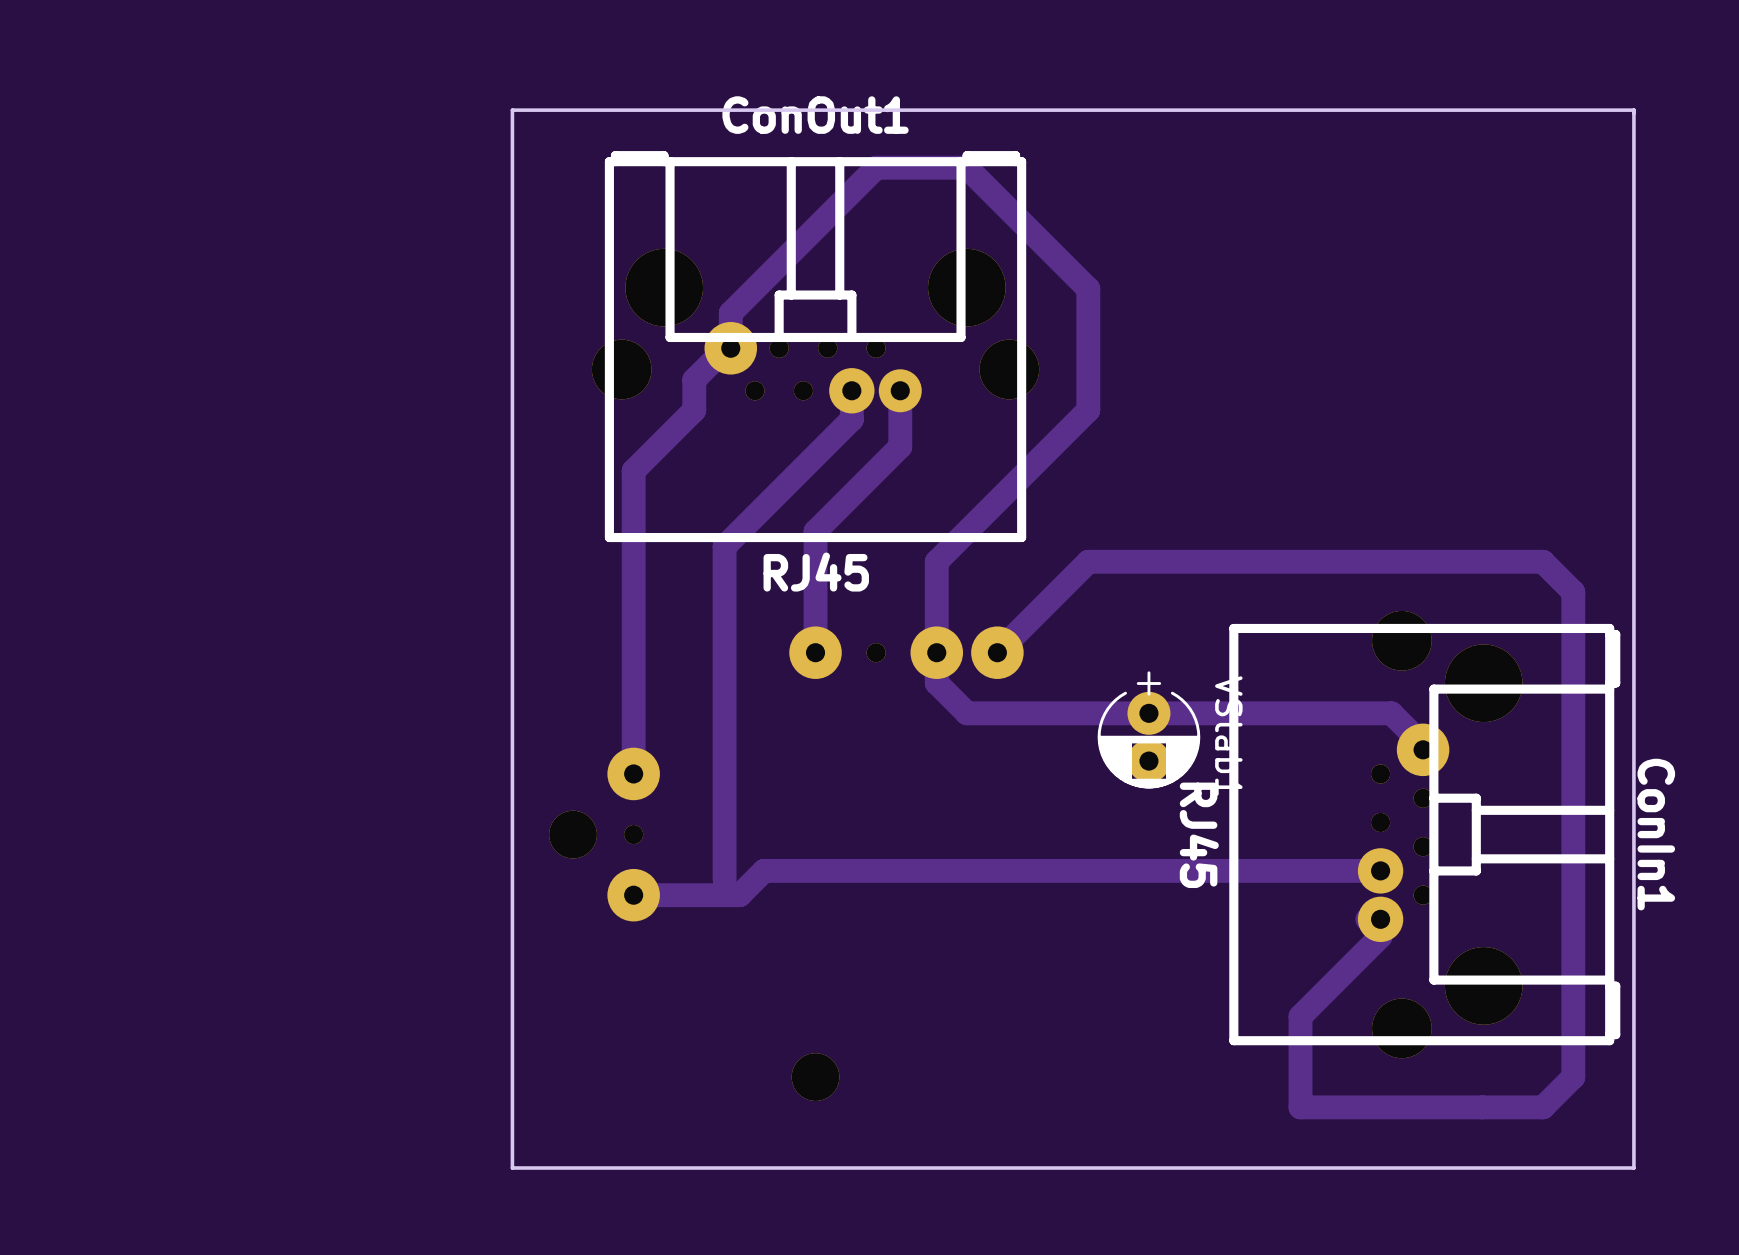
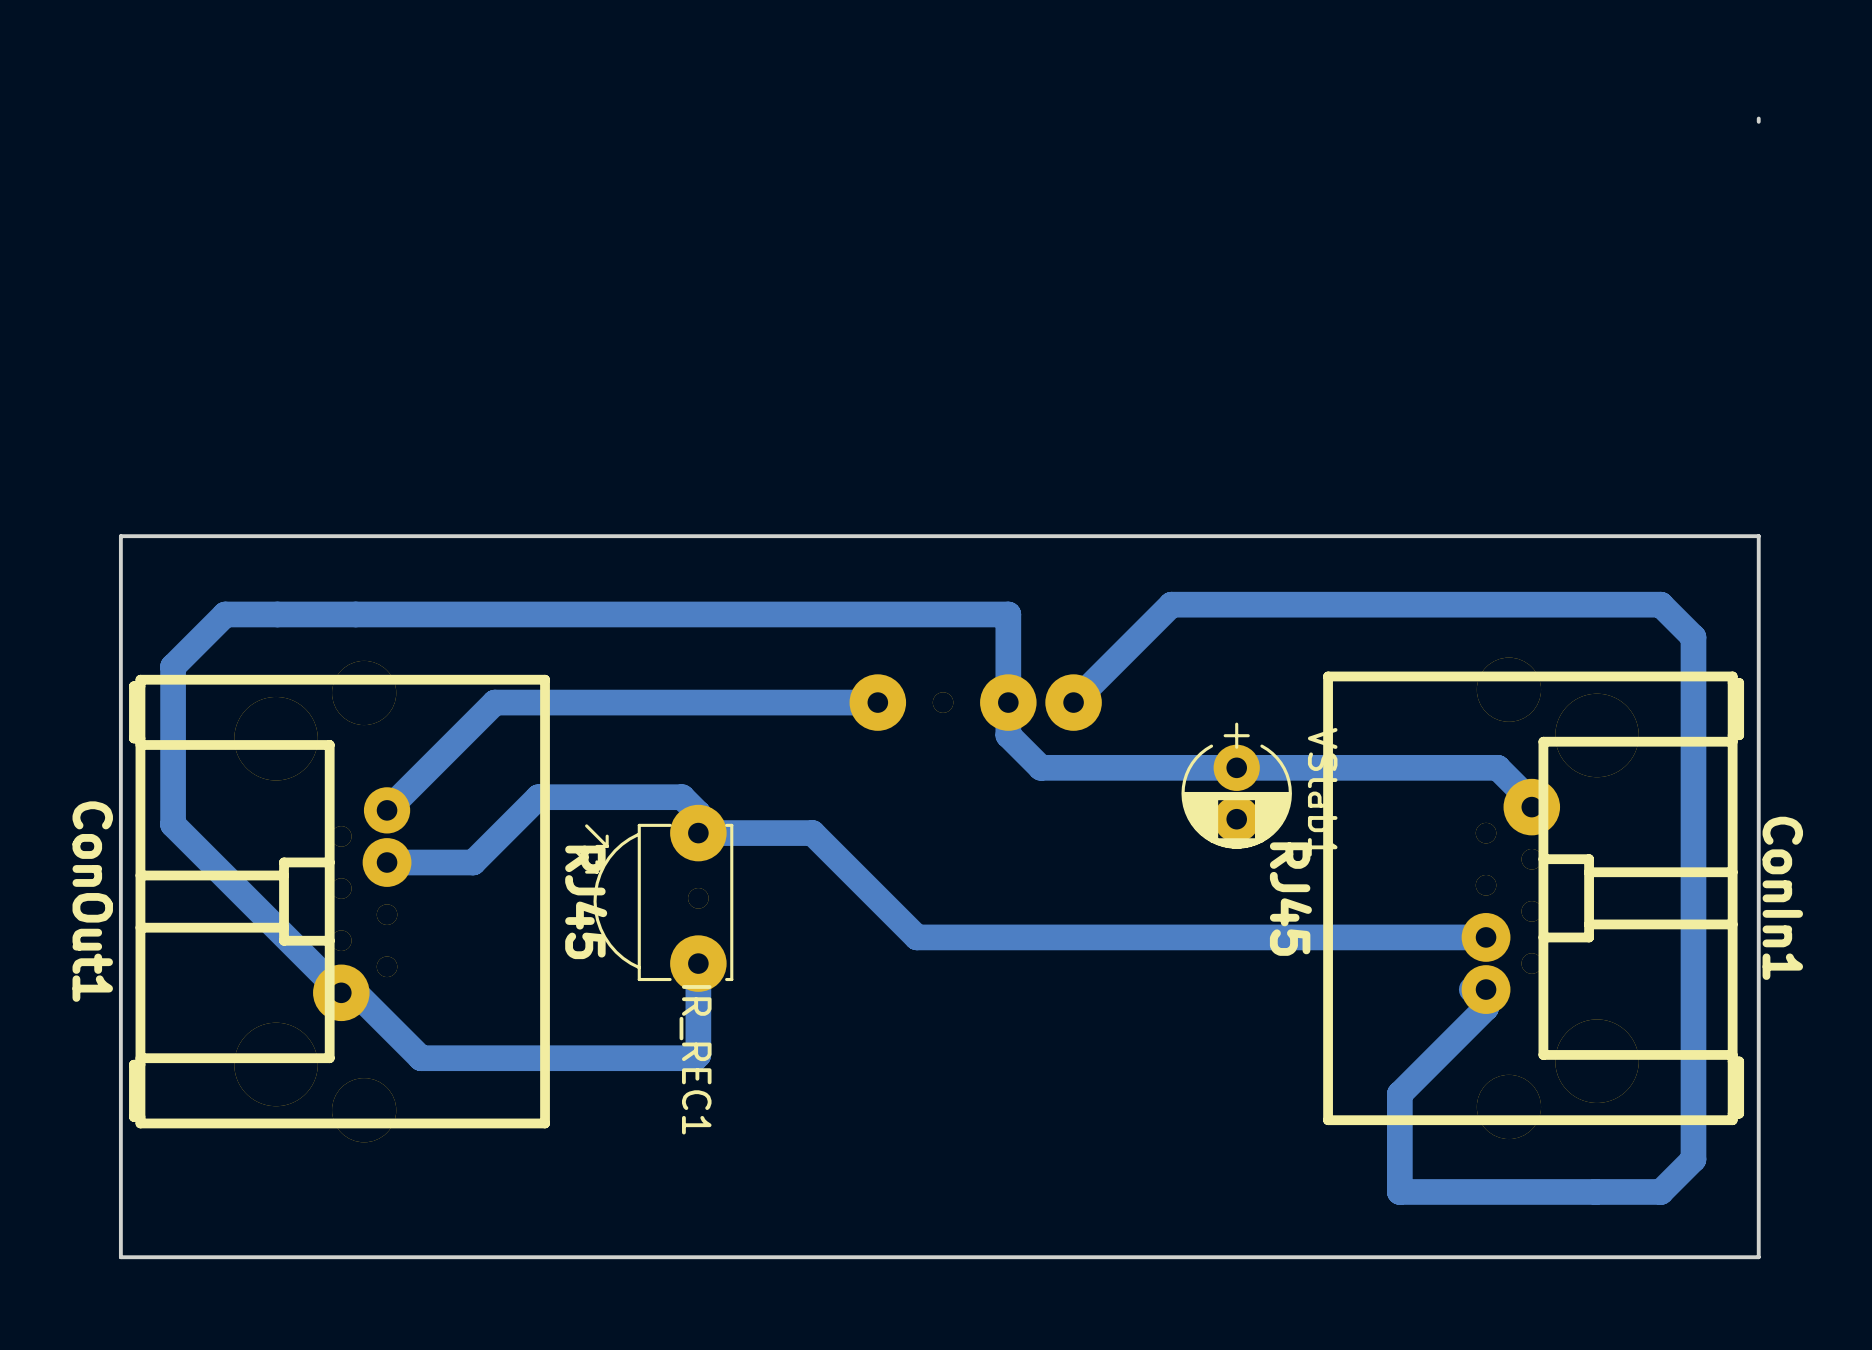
board edge: (1633, 110) (512, 110) (512, 1168) -> (1758, 536) (120, 536) (120, 1257) (551, 1257)
board edge: (1633, 113) (1633, 498) -> none
ConOut1 rotation: 0° (815, 346) -> 90° counterclockwise (339, 901)
ConOut1 position: (815, 346) -> (339, 901)
track: (730, 348) (730, 313) (876, 167) (967, 167) (1088, 288) (1088, 410) (936, 561) (936, 570) -> (341, 992) (173, 824) (173, 666) (225, 614) (1008, 614)
track: (730, 348) (725, 348) (694, 379) (694, 410) (633, 470) (633, 773) -> none
track: (851, 390) (851, 419) (724, 546) (724, 880) -> none
track: (906, 396) (900, 390) (900, 446) (815, 531) (815, 652) -> none
track: none -> (887, 692) (877, 702) (494, 702) (387, 810)
part: (573, 834) -> none
IR_REC1 side: top (633, 834) -> bottom (654, 898)
track: (851, 870) (764, 870) (739, 895) (633, 895) -> (916, 937) (812, 833) (698, 833) (698, 813) (682, 797) (538, 797) (473, 862) (387, 862)
track: none -> (698, 963) (698, 1054) (695, 1058) (421, 1058) (355, 992) (341, 992)
part: (815, 1077) -> none

